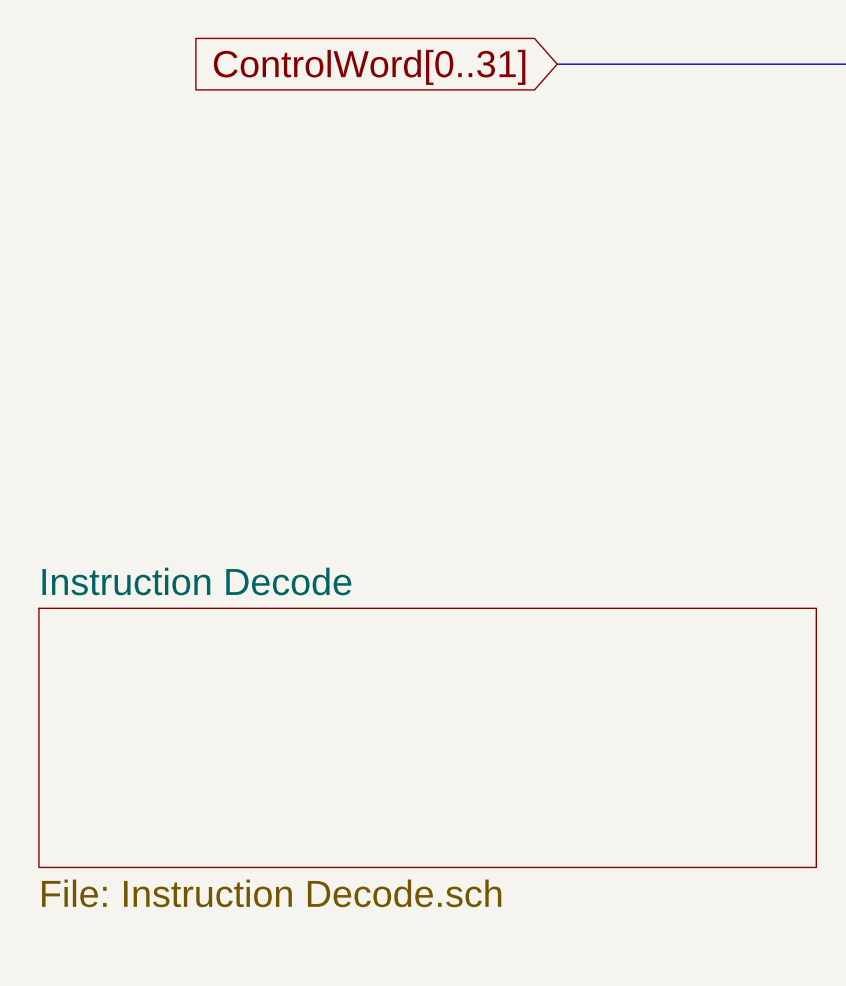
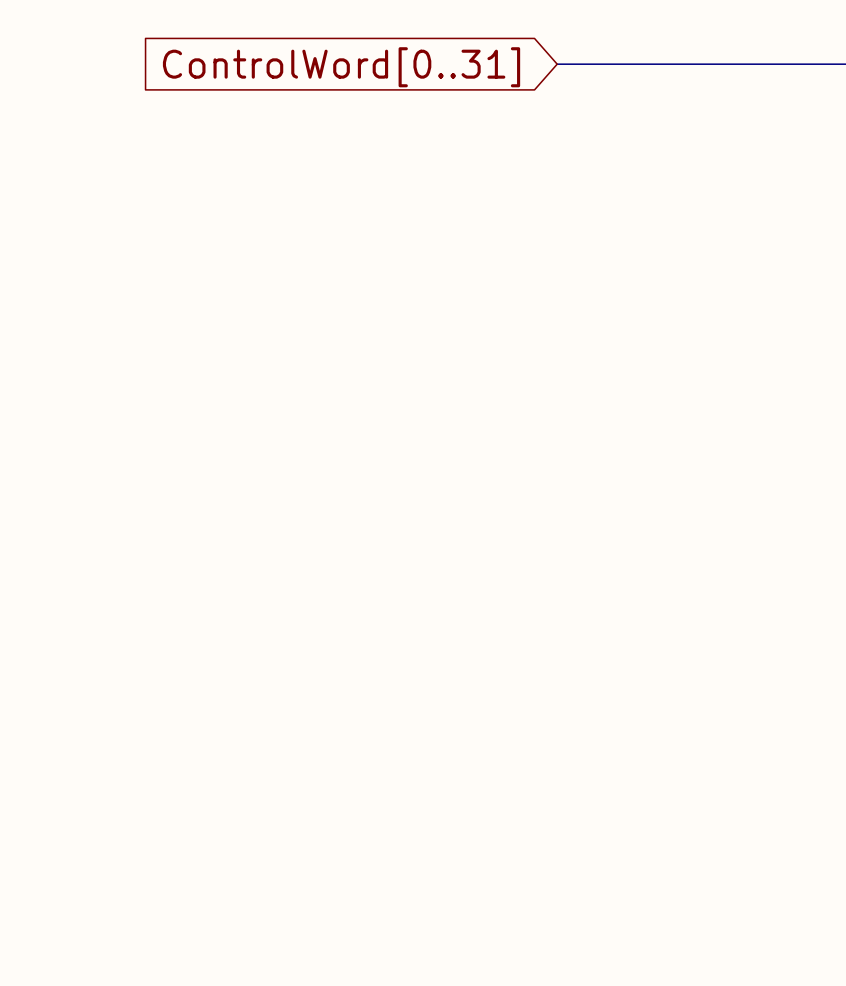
sheet Instruction Decode: File: Instruction Decode.sch (427, 737) -> none

